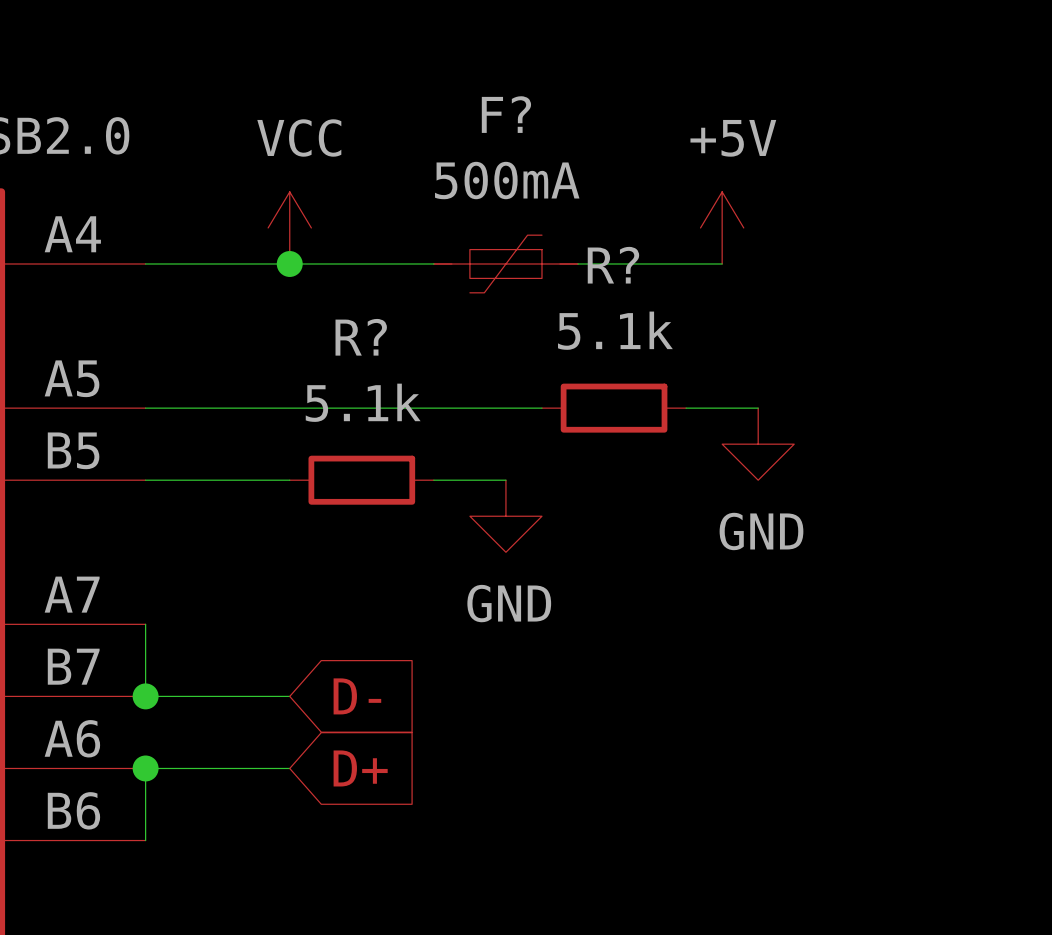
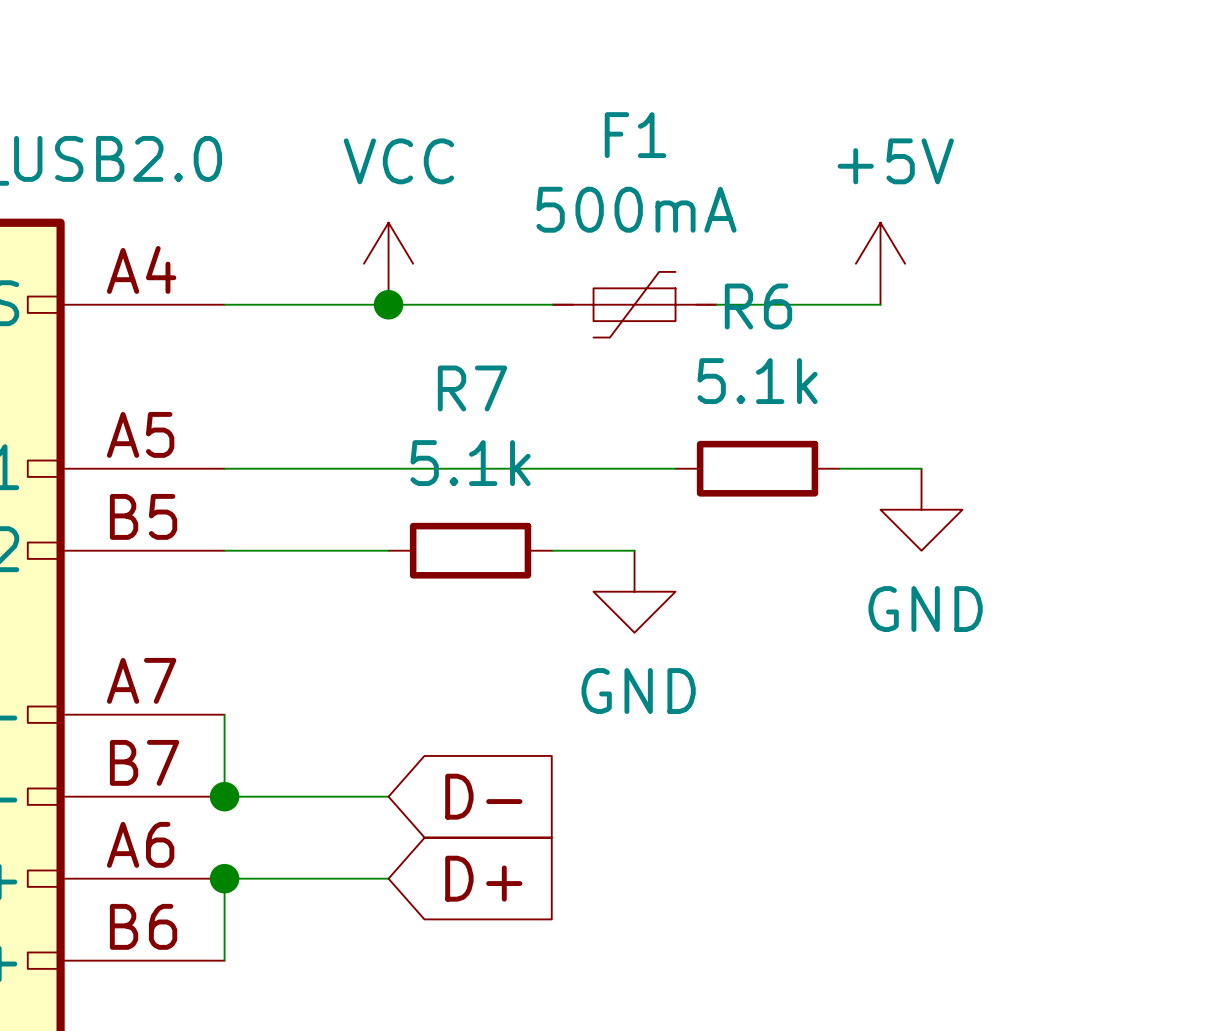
F? name: F? (506, 114) -> F1 (635, 135)
R? name: R? (613, 265) -> R6 (758, 306)
R? name: R? (361, 337) -> R7 (472, 388)

